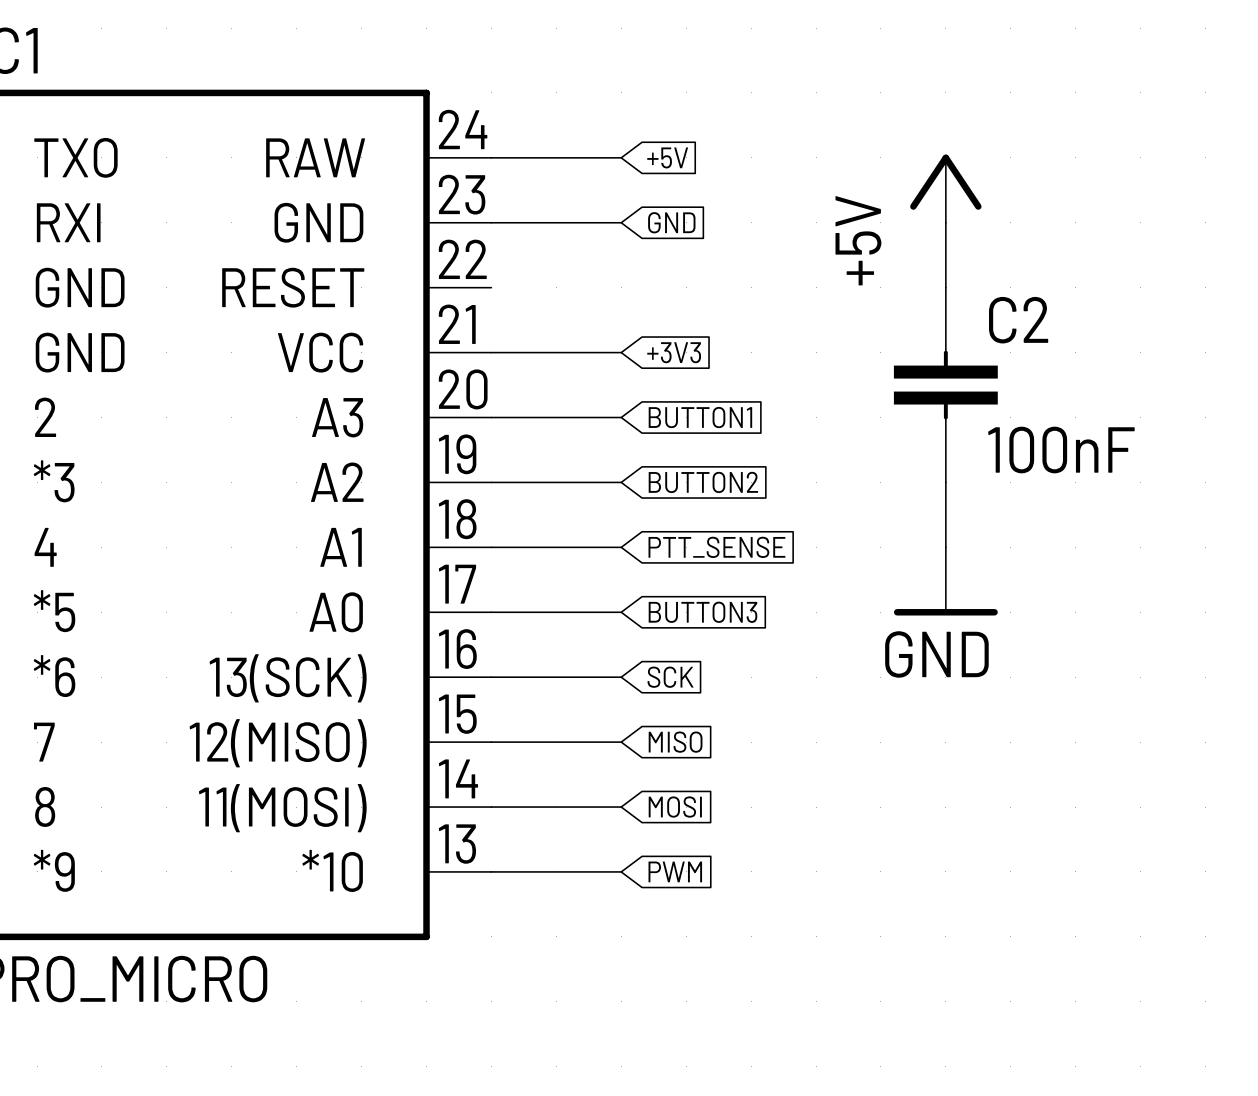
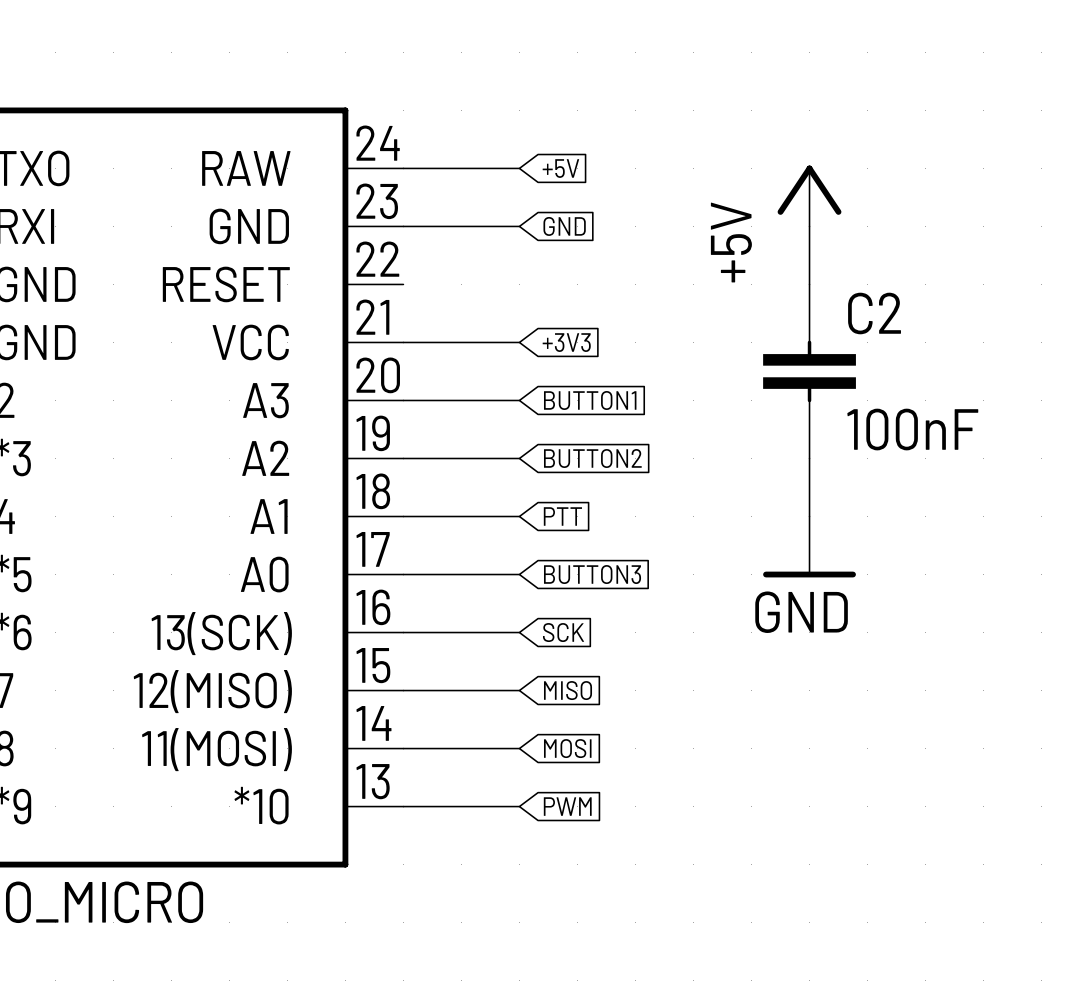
global label: PTT_SENSE (716, 547) -> PTT (562, 516)

